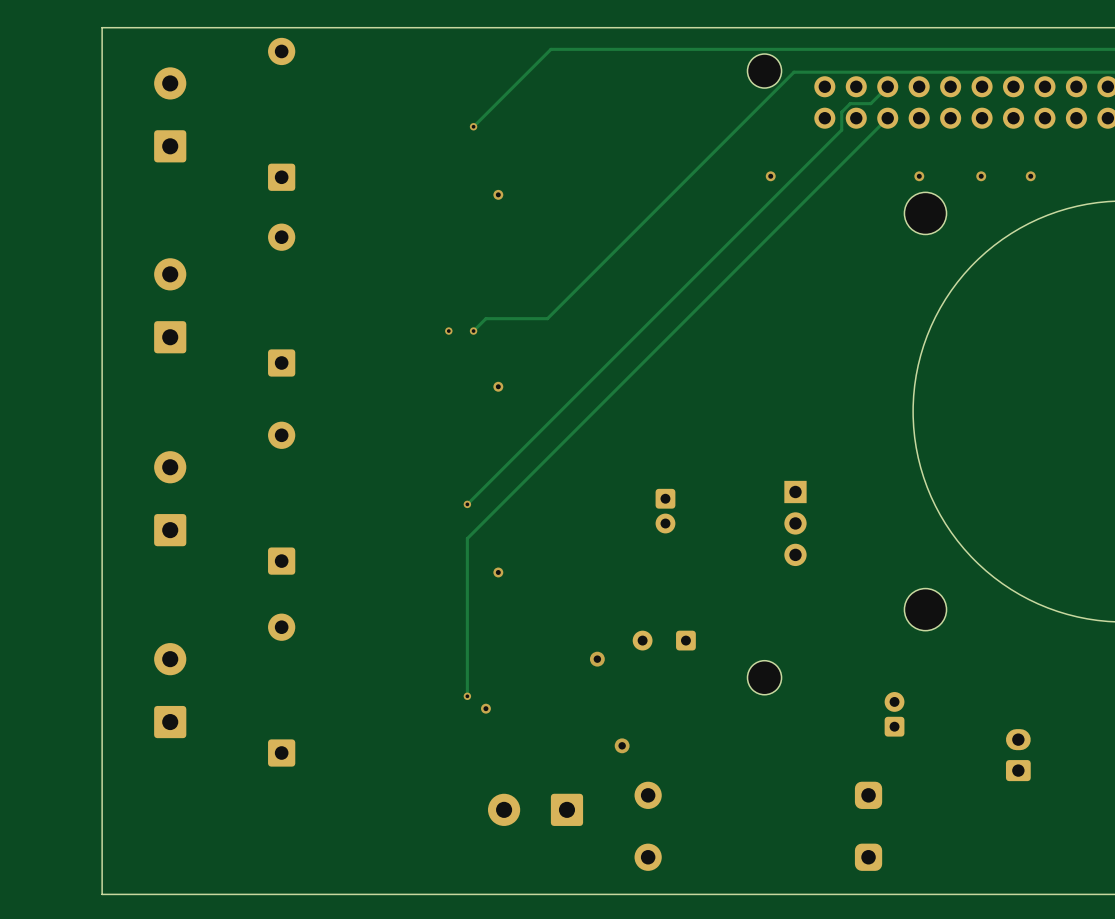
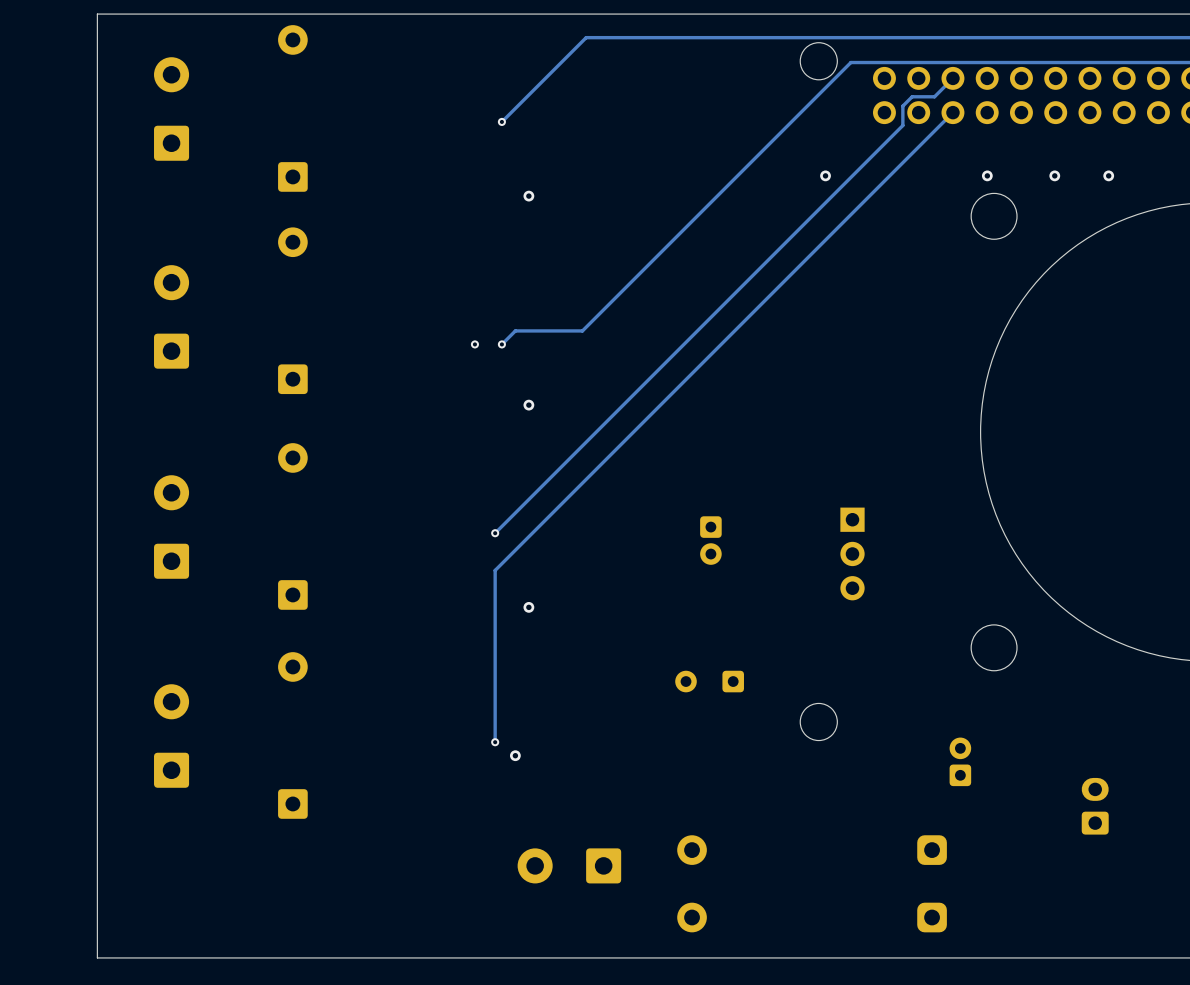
via: (597, 659) -> none
via: (622, 745) -> none

